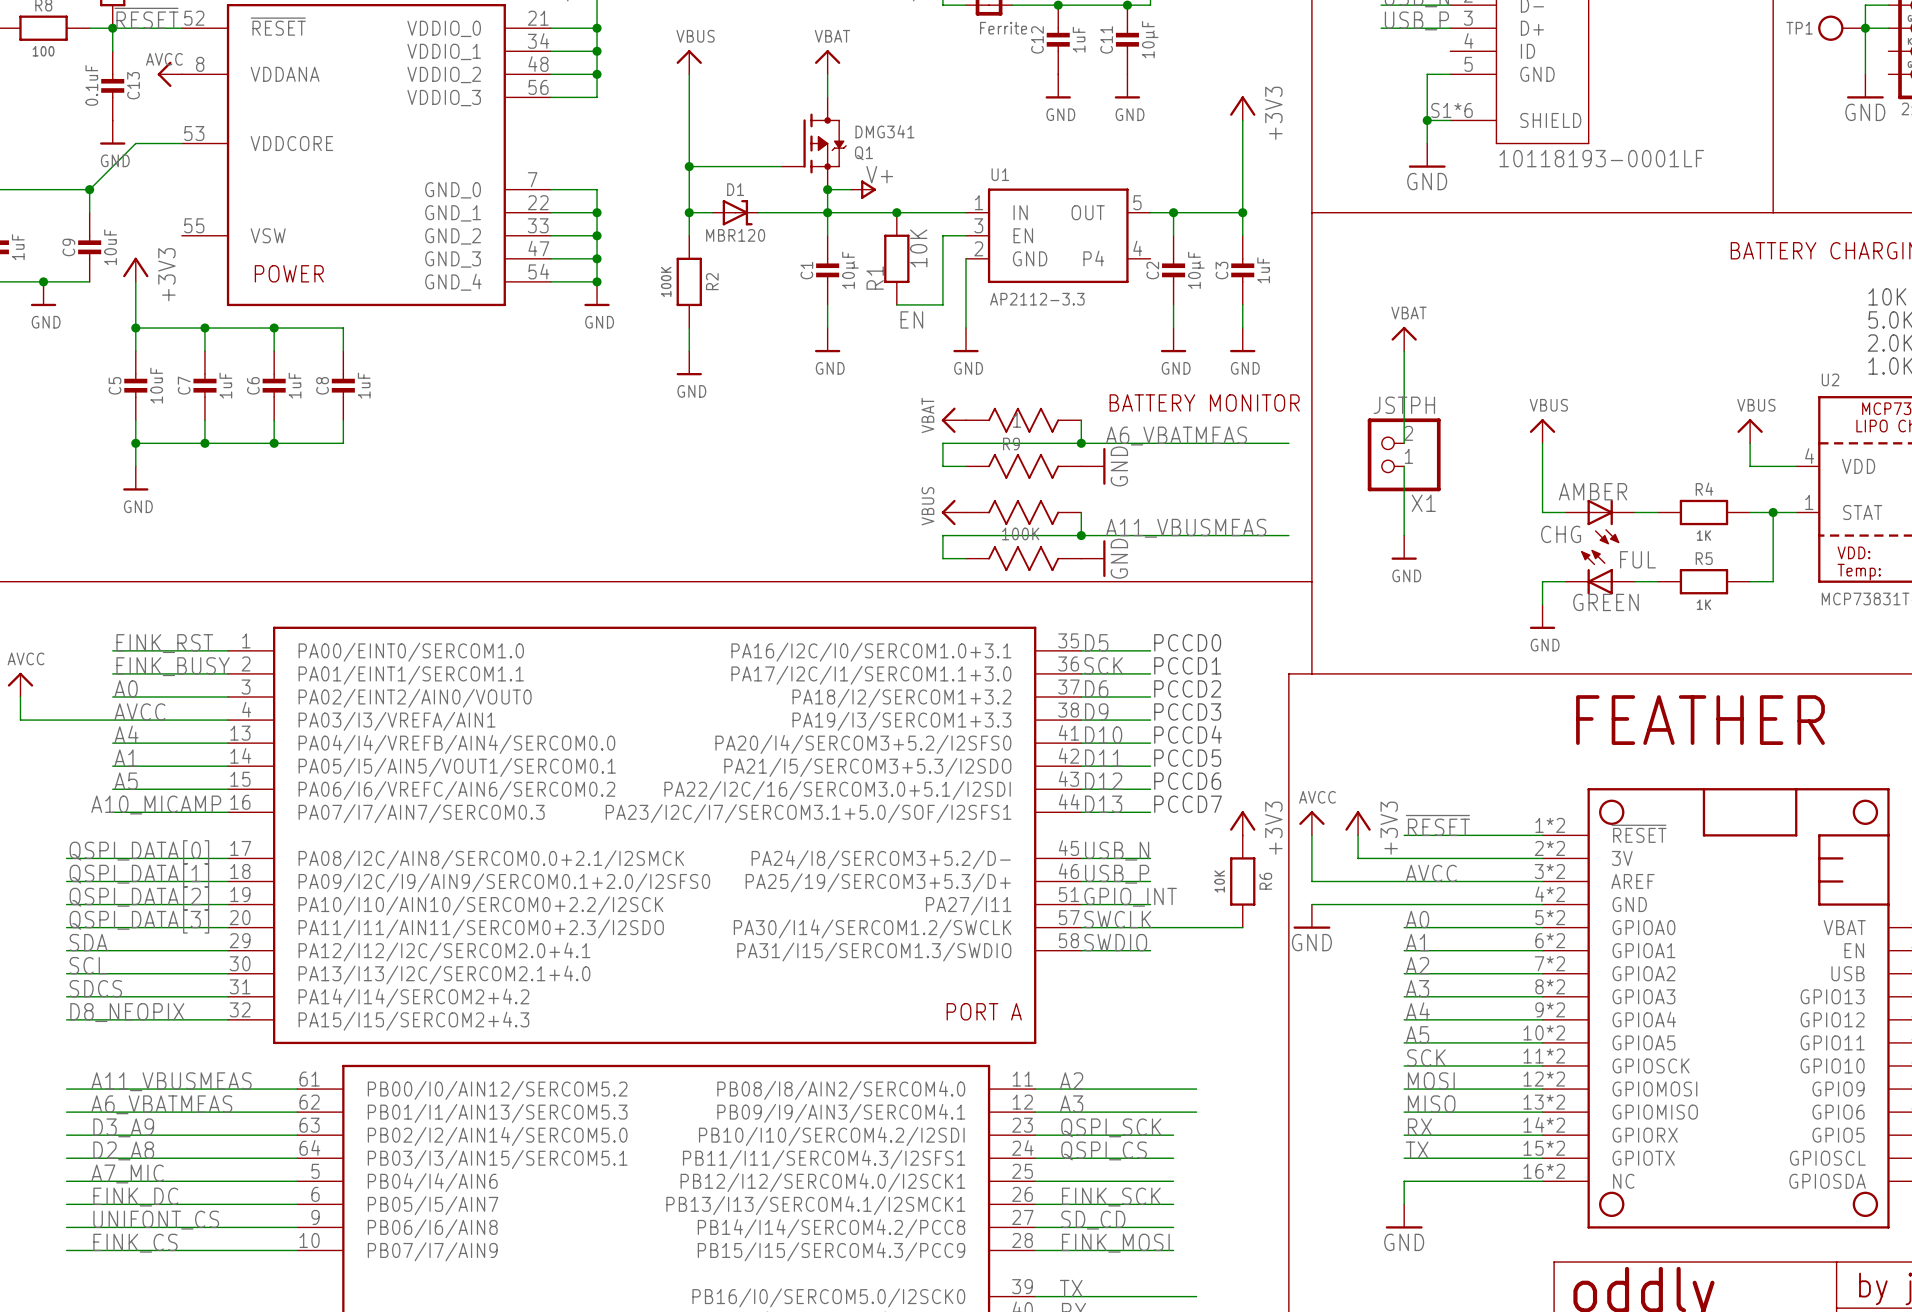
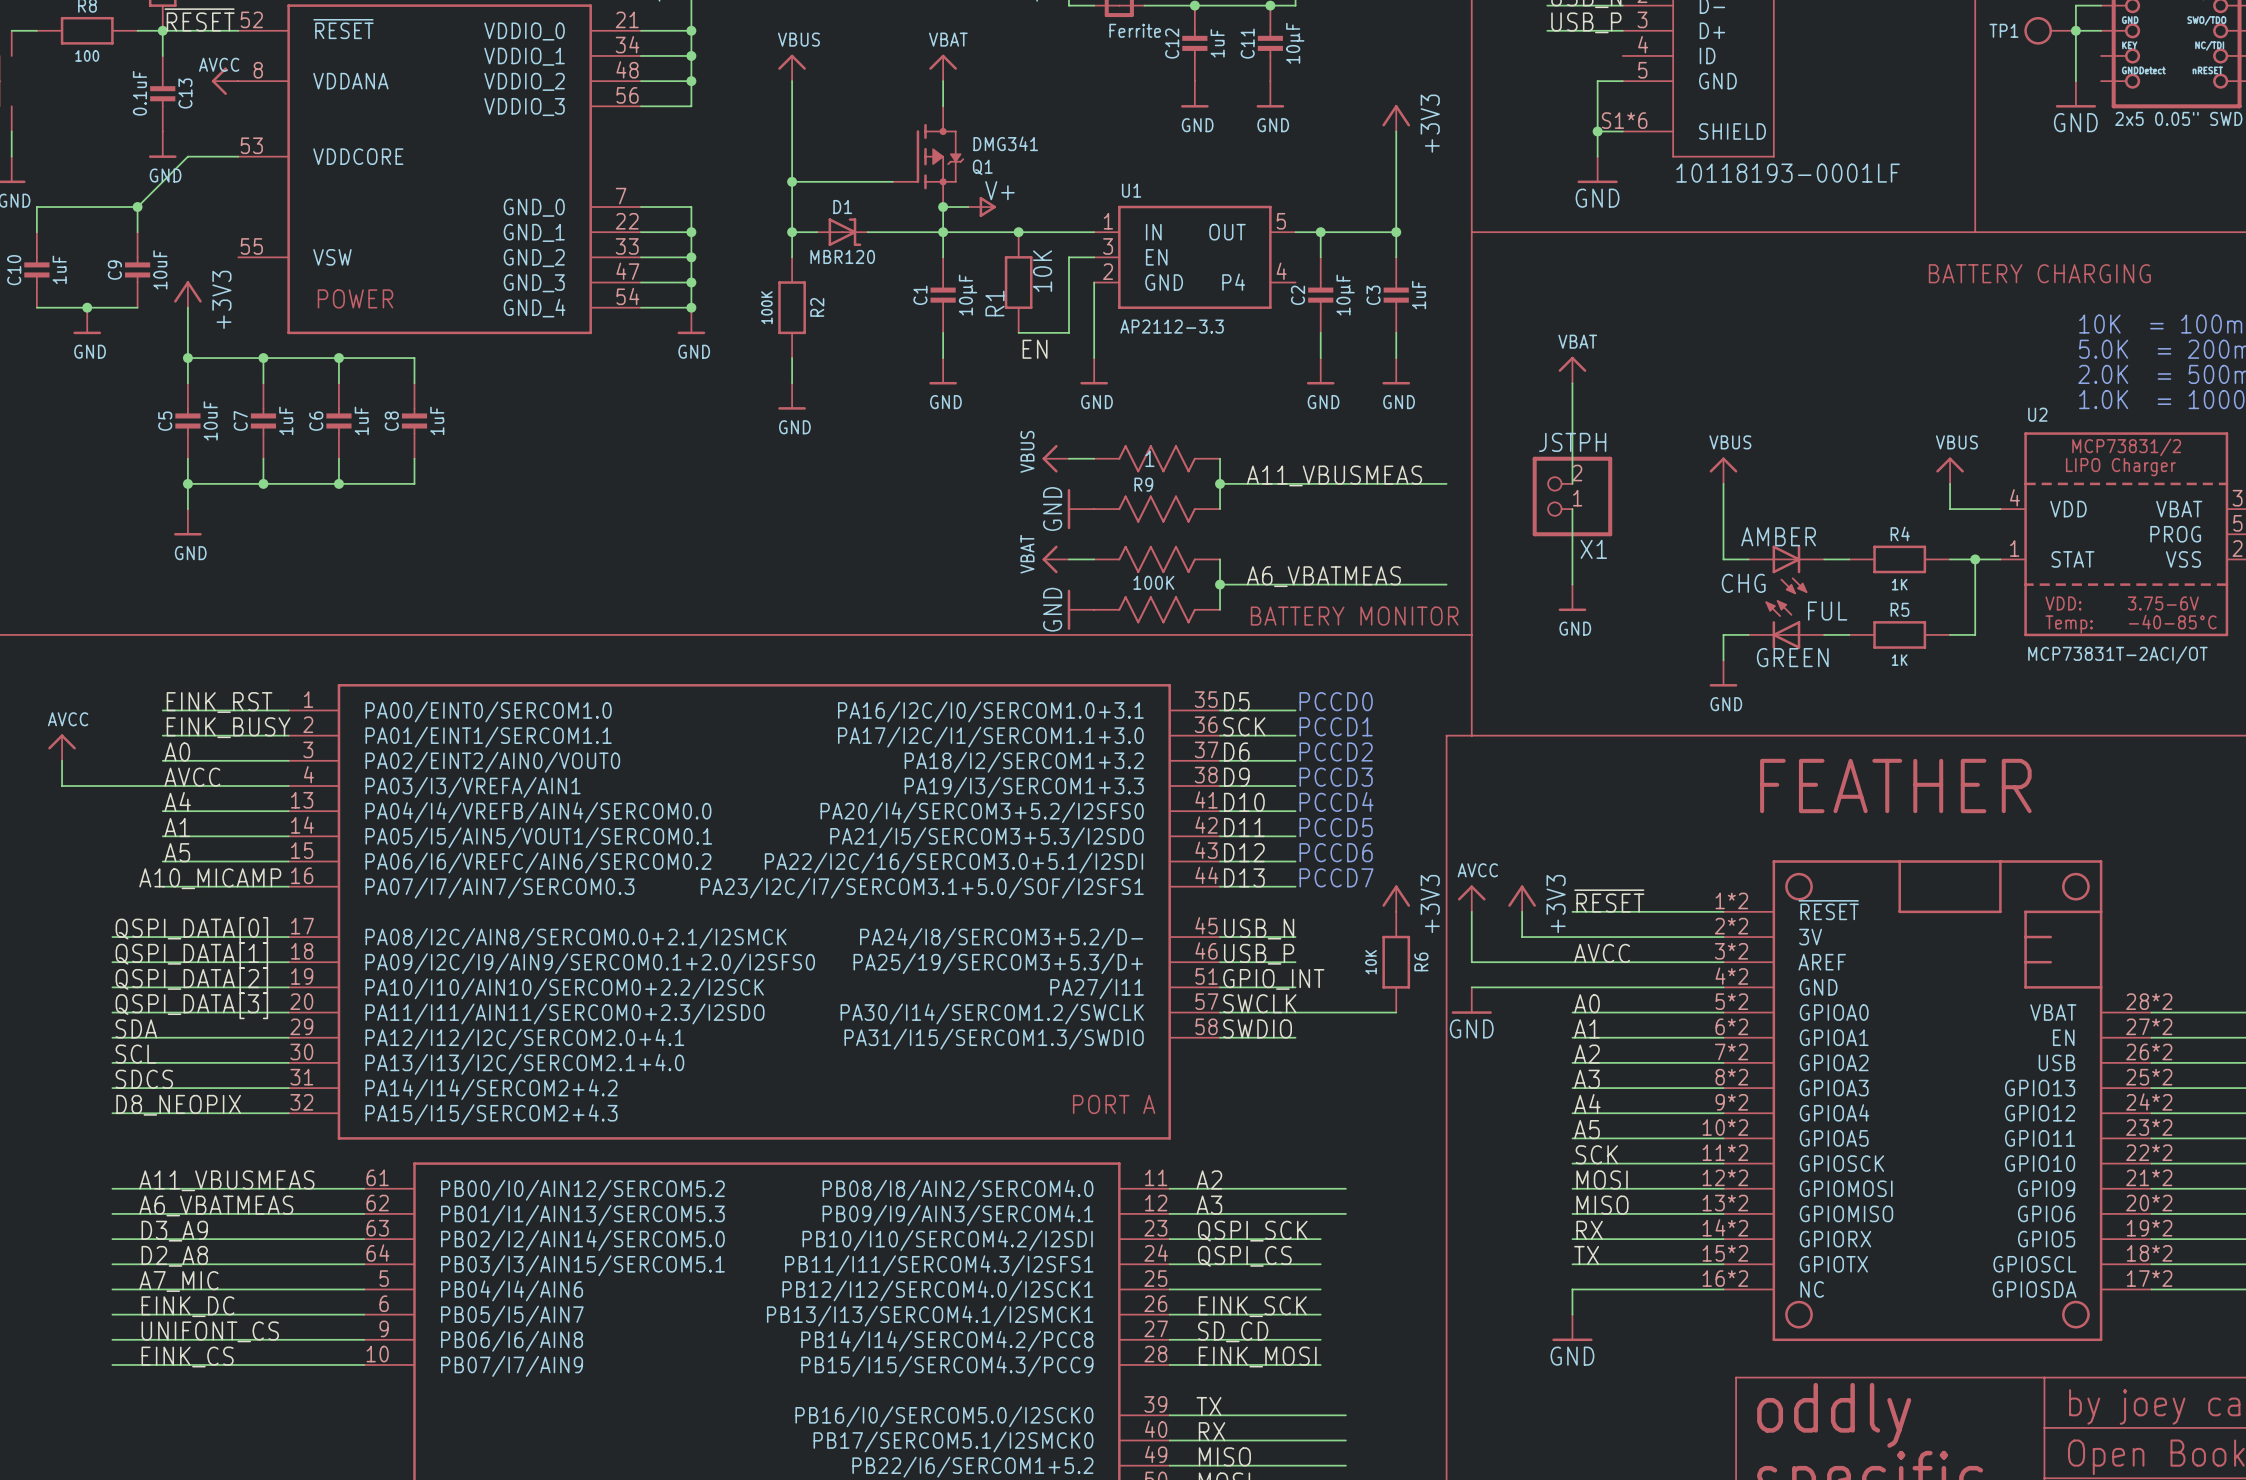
text position: BATTERY MONITOR (1204, 402) -> BATTERY MONITOR (1354, 616)
power symbol position: VBAT (953, 420) -> VBAT (1055, 559)
label: A6_VBATMEAS (1176, 436) -> A11_VBUSMEAS (1334, 475)
wire: (1081, 443) (942, 443) (942, 466) (966, 466) -> (1220, 483) (1220, 509)
power symbol: none -> GND (1080, 509)
power symbol: GND (1093, 466) -> none
power symbol position: VBUS (953, 512) -> VBUS (1055, 458)
label: A11_VBUSMEAS (1186, 528) -> A6_VBATMEAS (1323, 576)
wire: (1081, 535) (942, 535) (942, 558) (966, 558) -> (1220, 584) (1220, 609)
power symbol: none -> GND (1080, 609)
power symbol: GND (1093, 558) -> none

